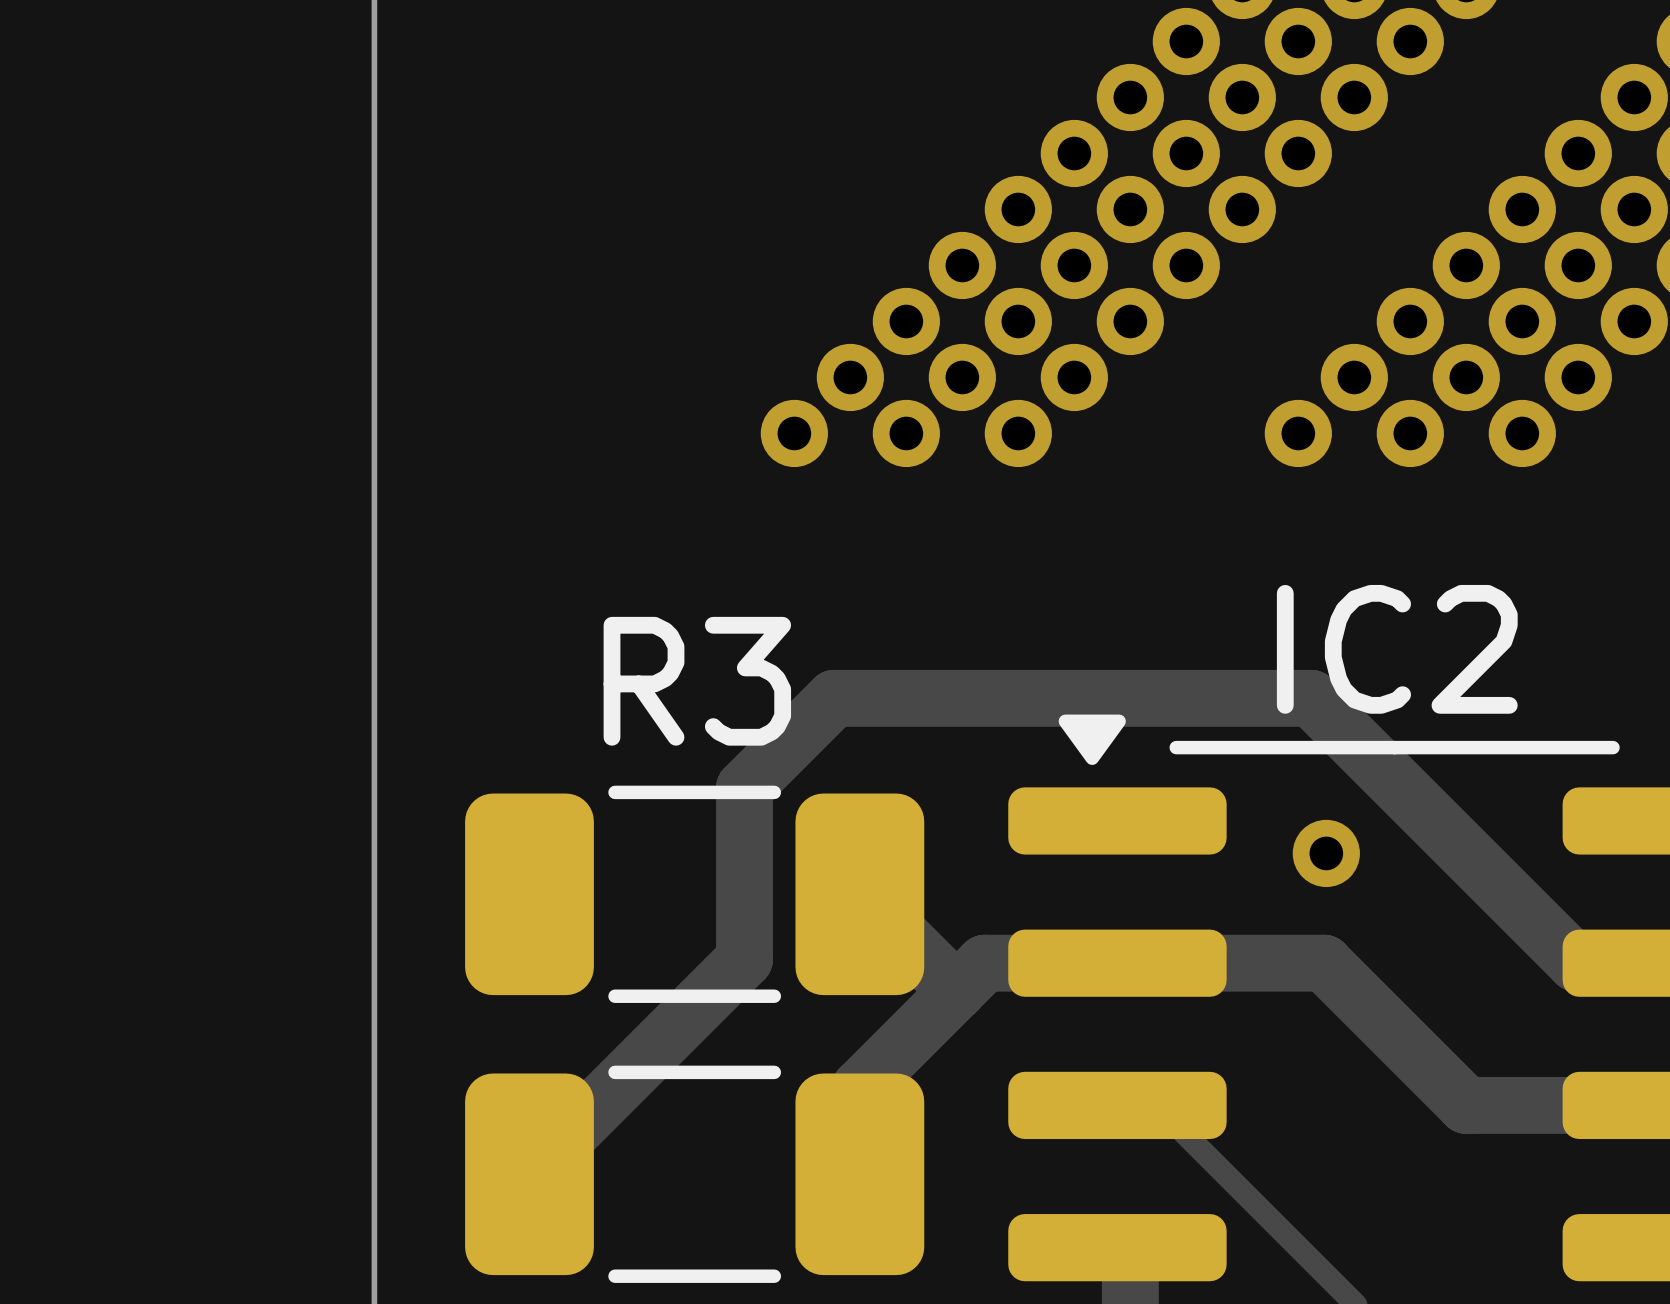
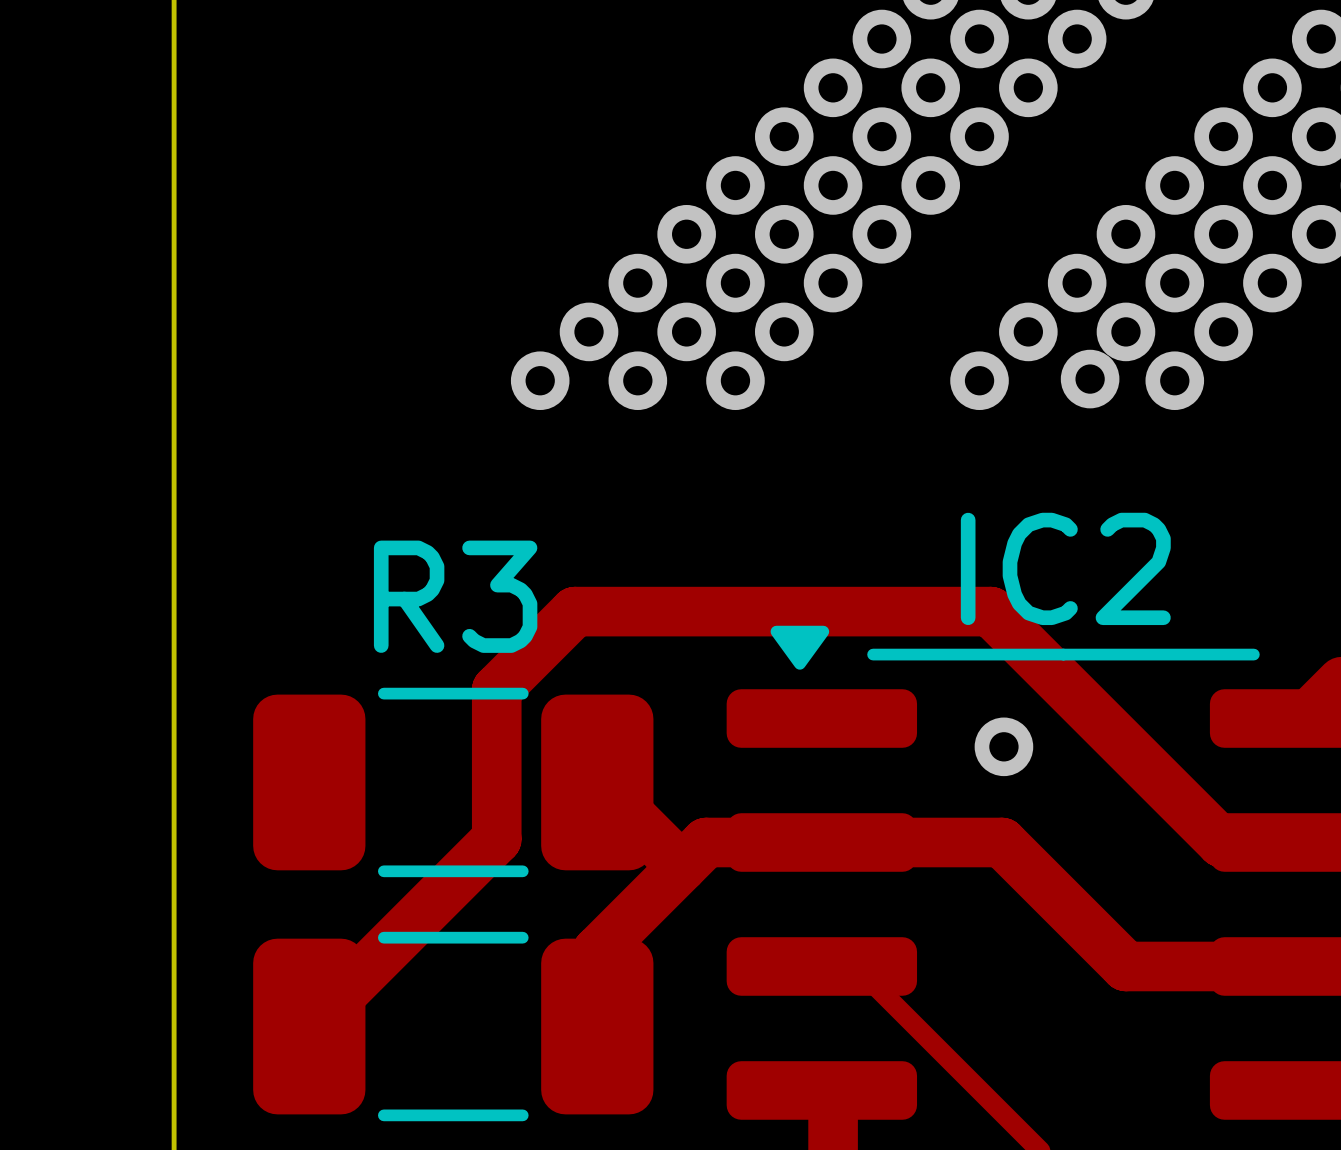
via position: (1410, 433) -> (1090, 379)

